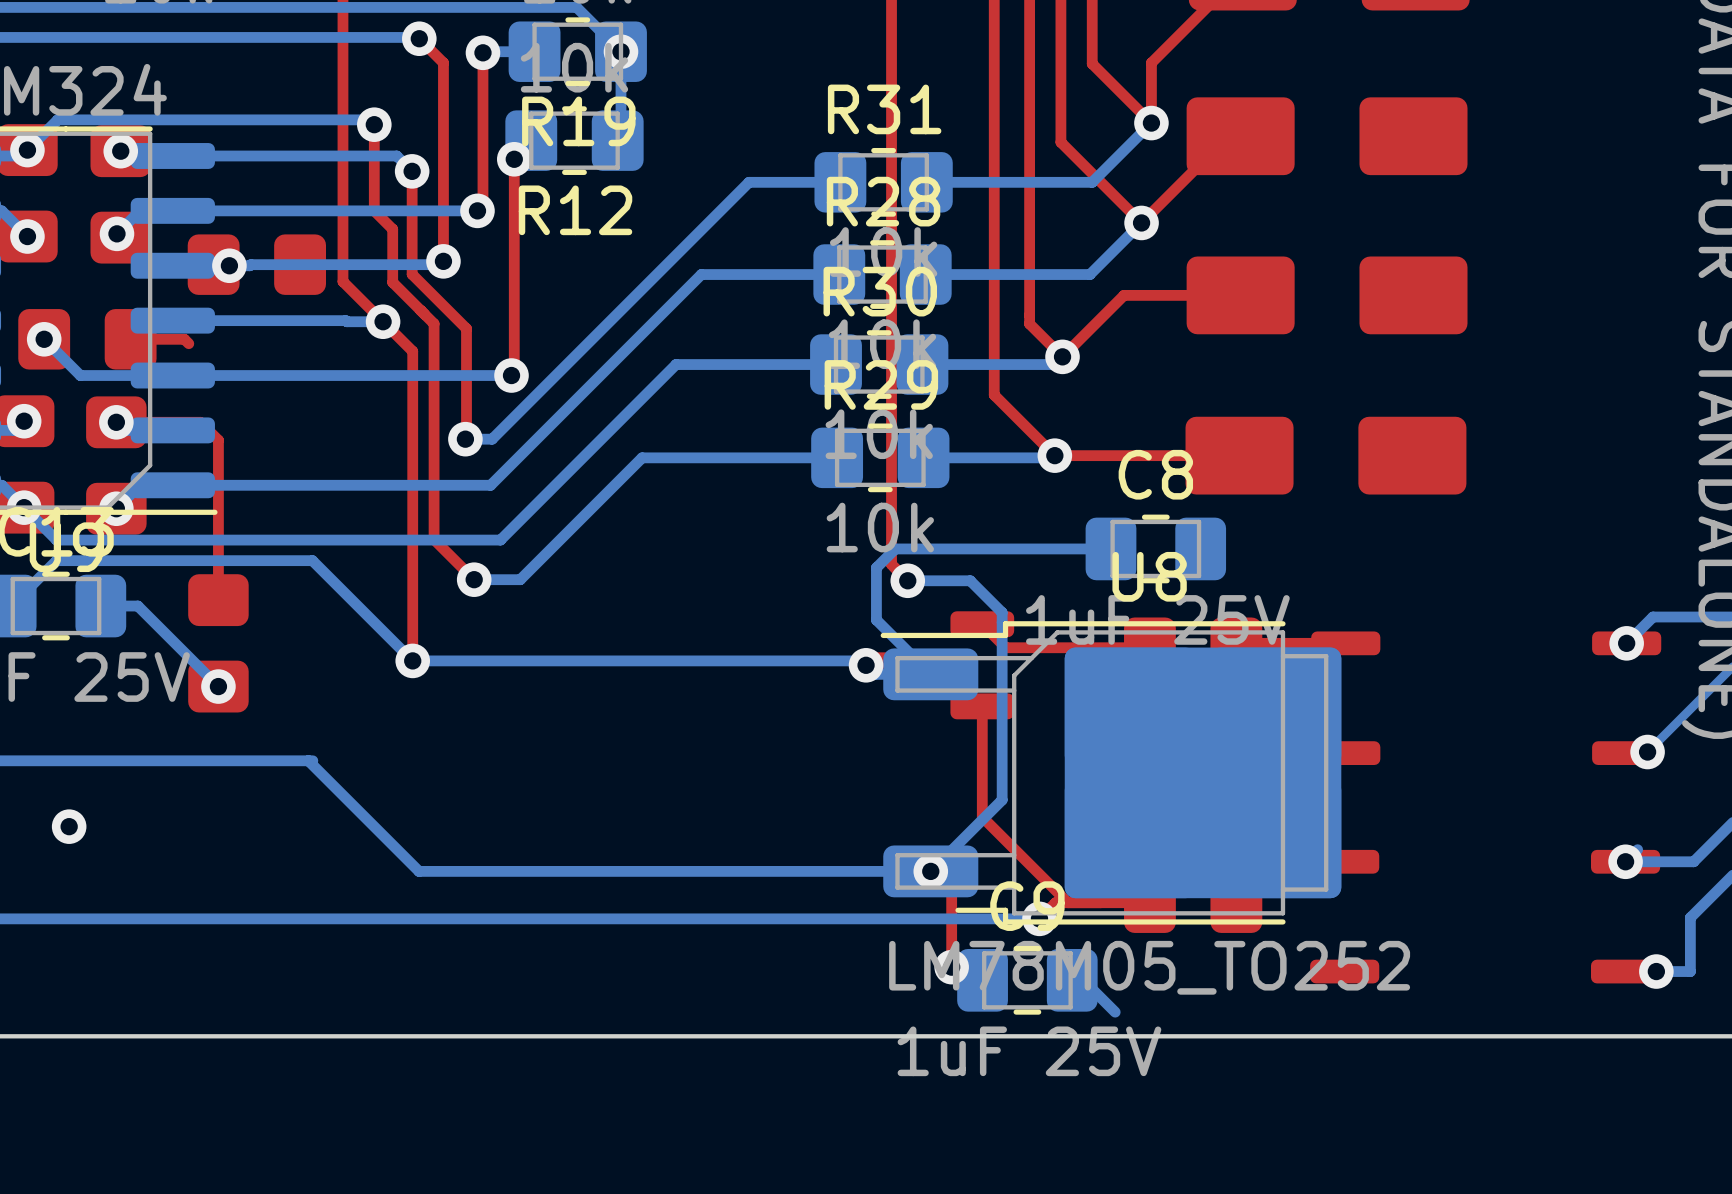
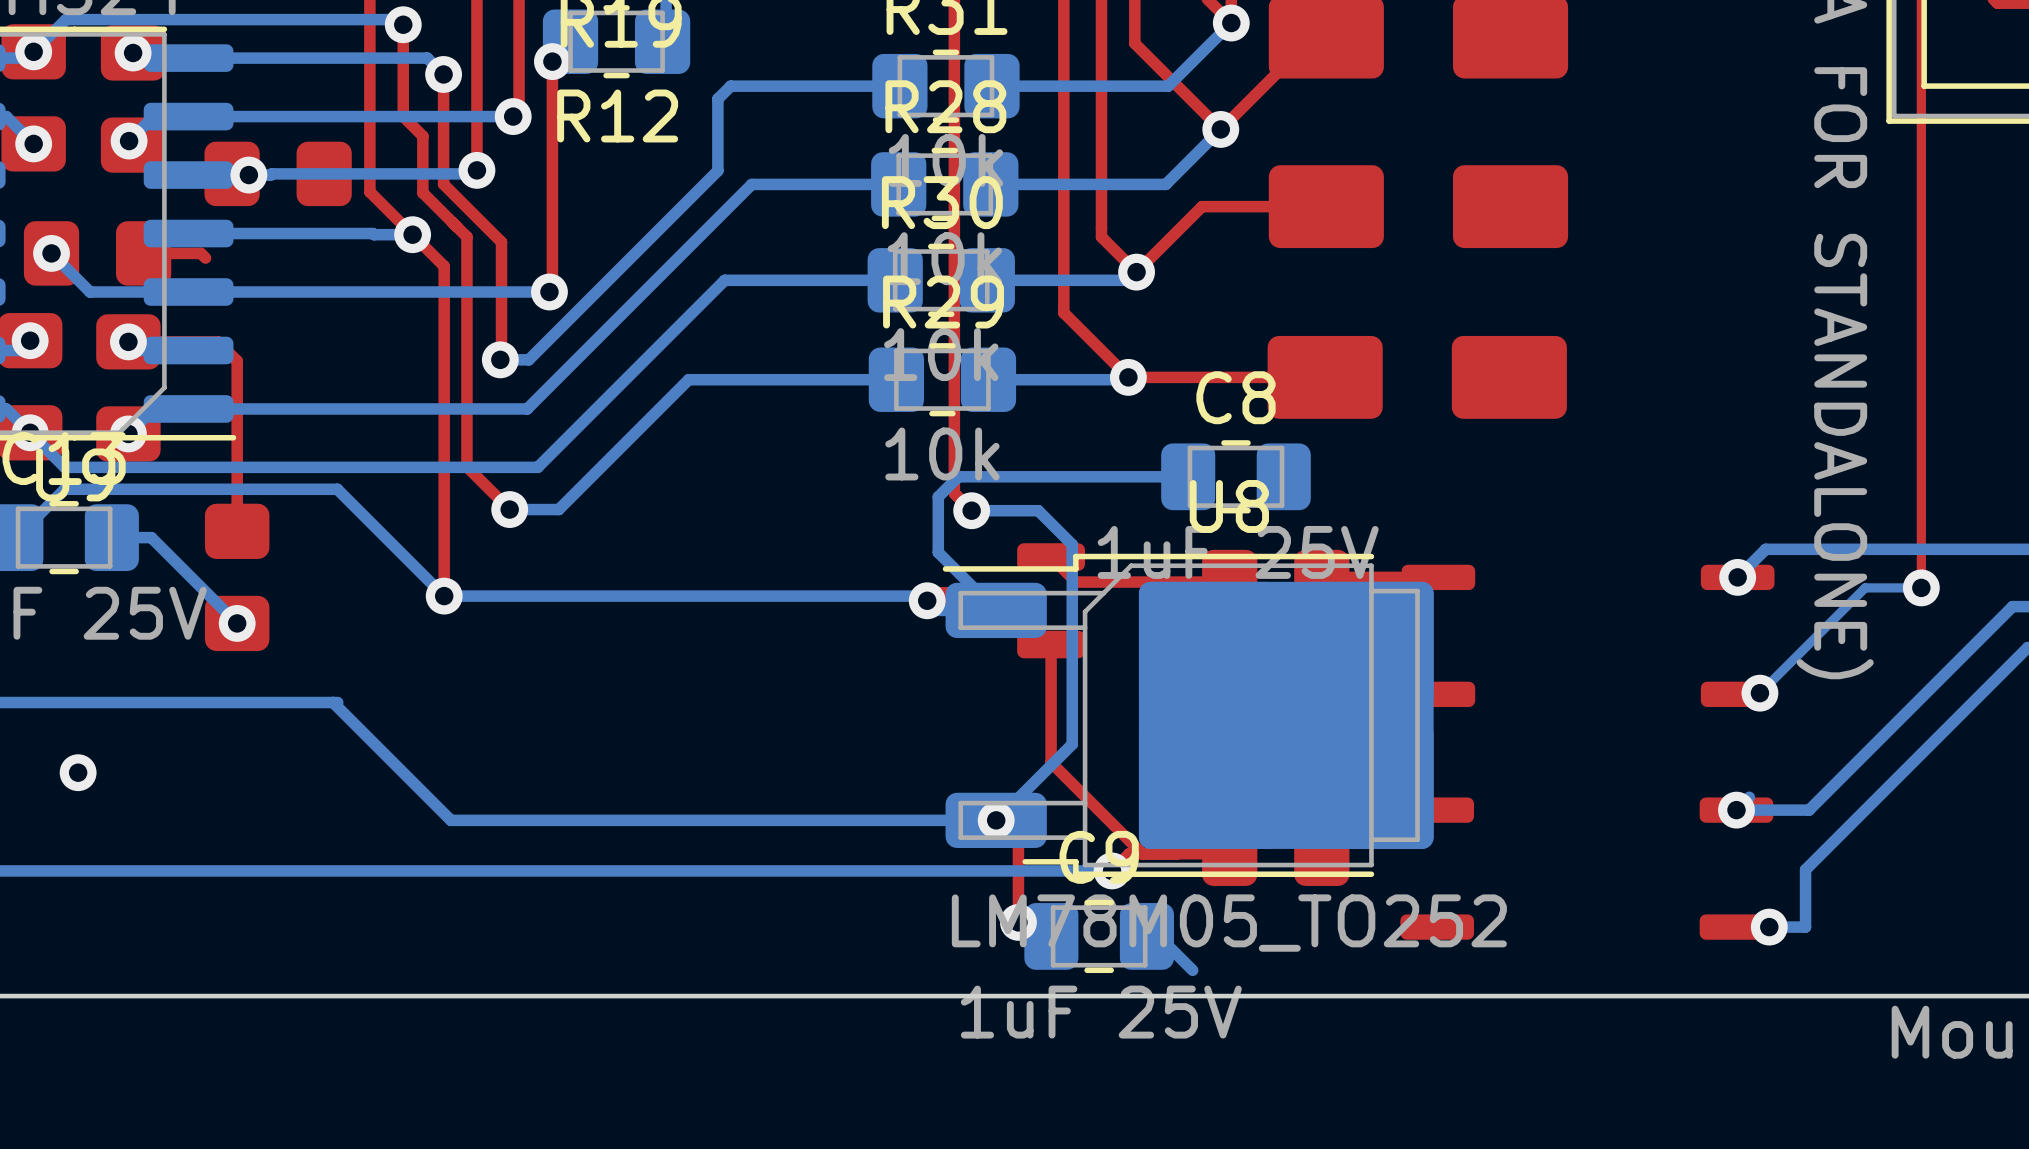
bottom track: (749, 182) (669, 261) -> (802, 86) (730, 86) (717, 99) (717, 170)

